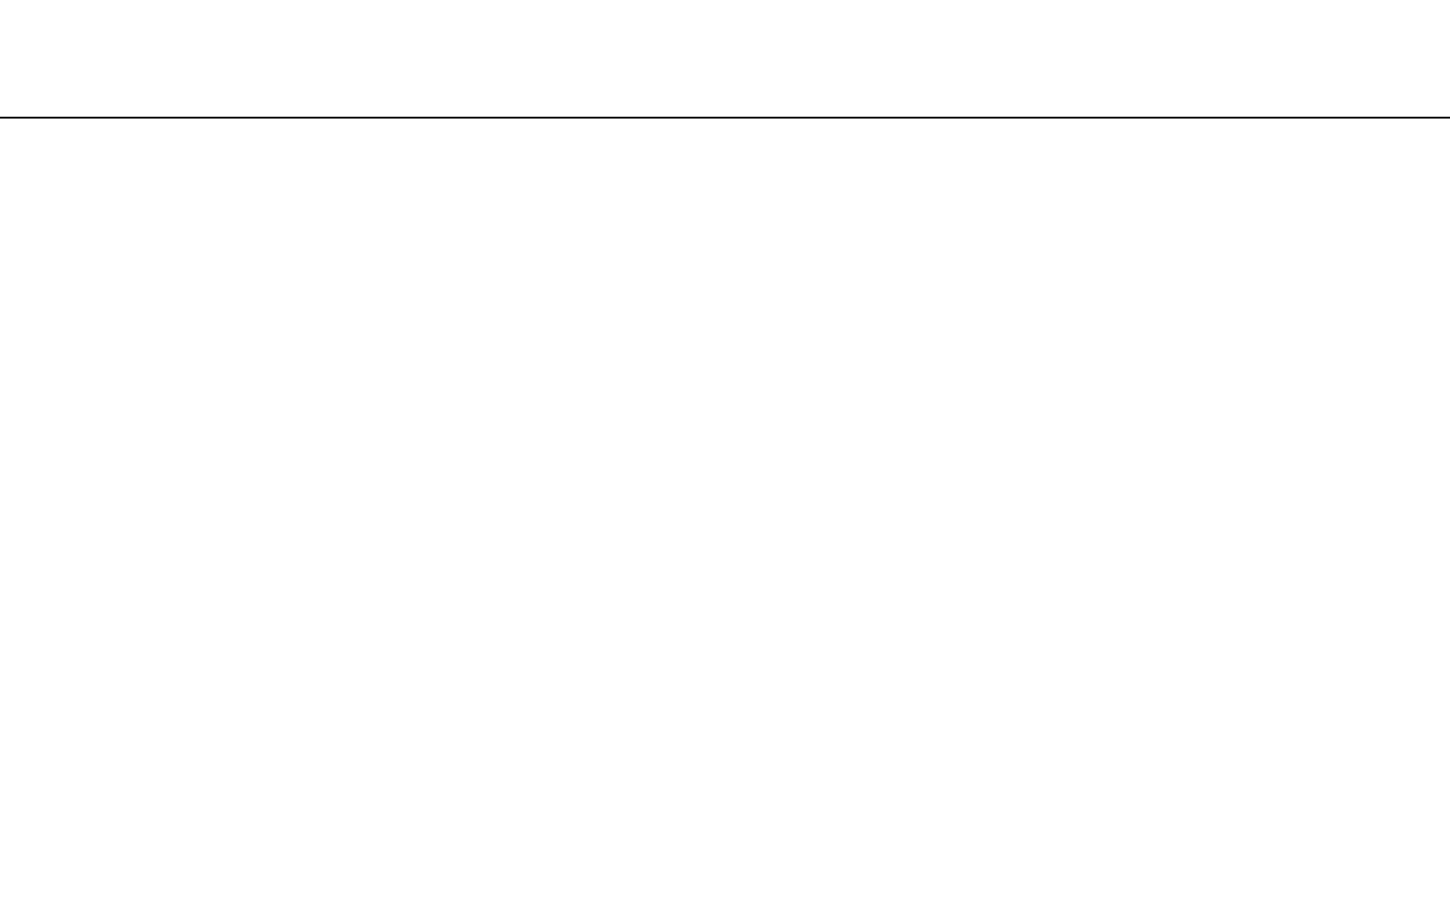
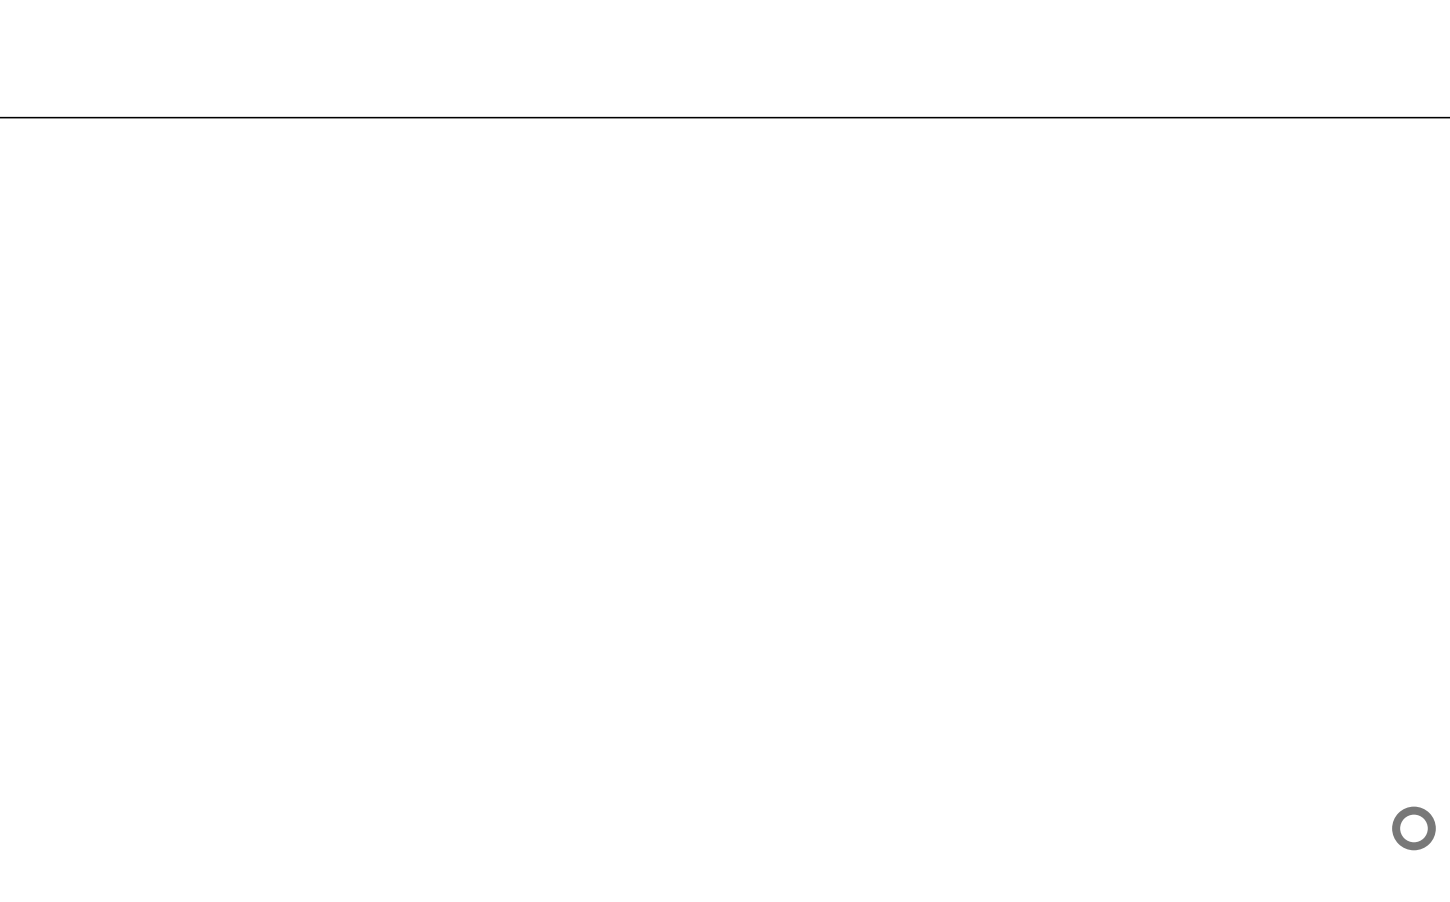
via: none -> (1413, 828)

